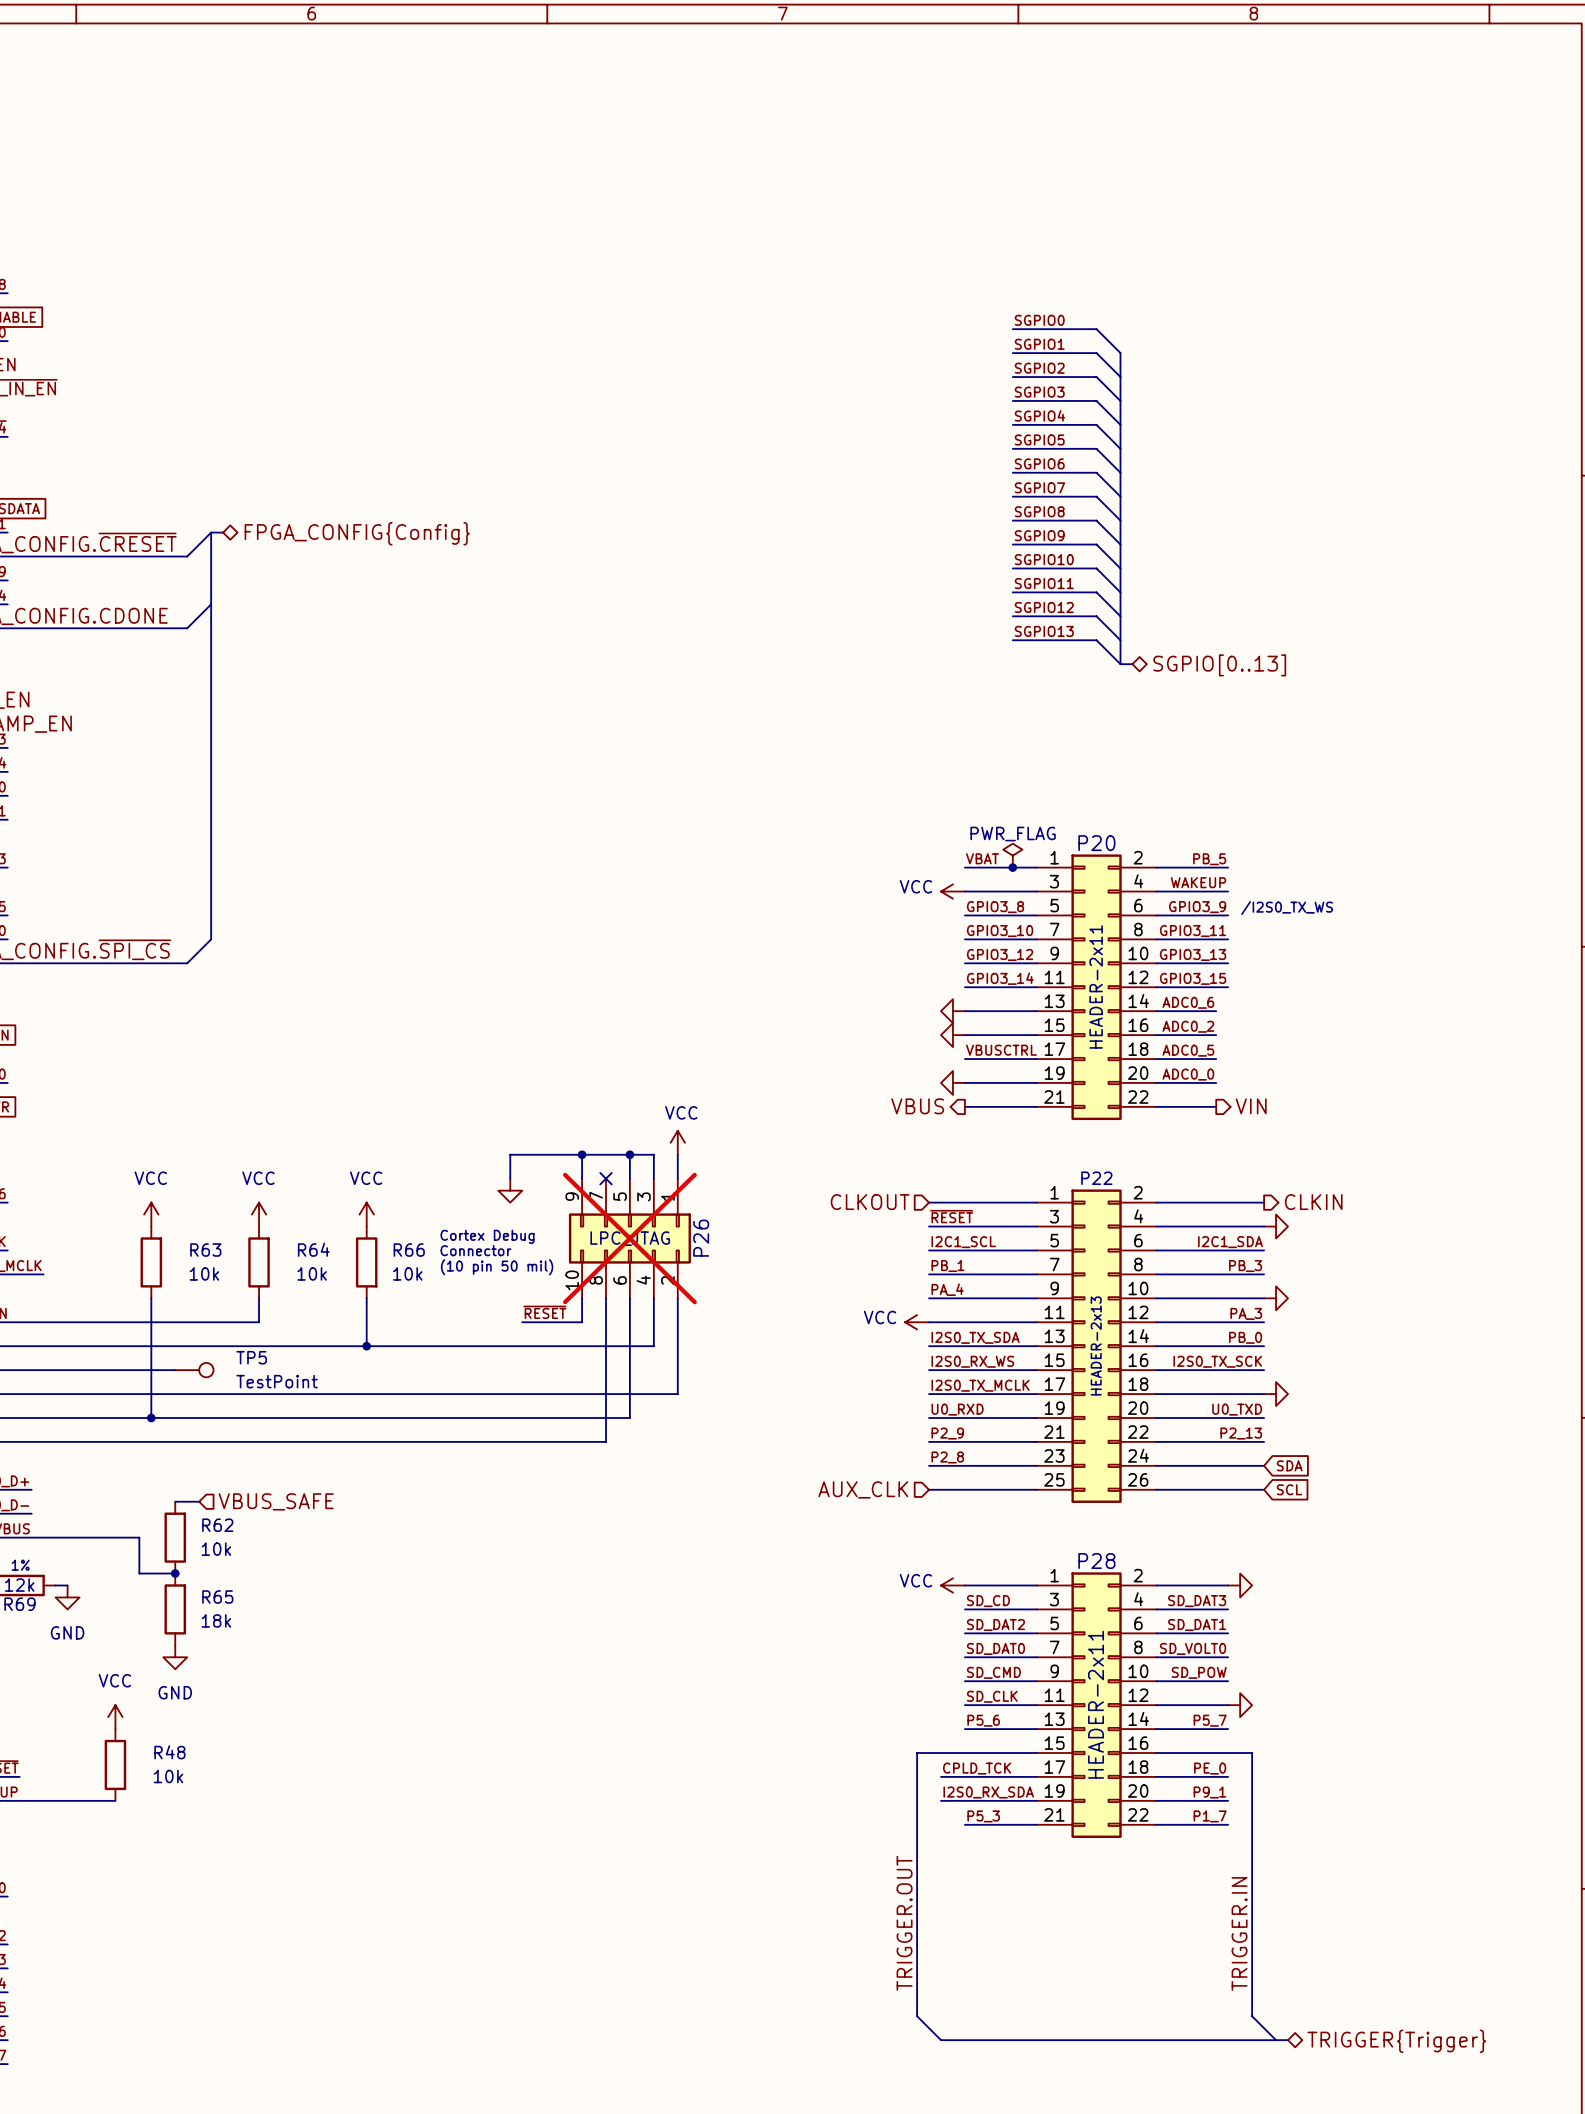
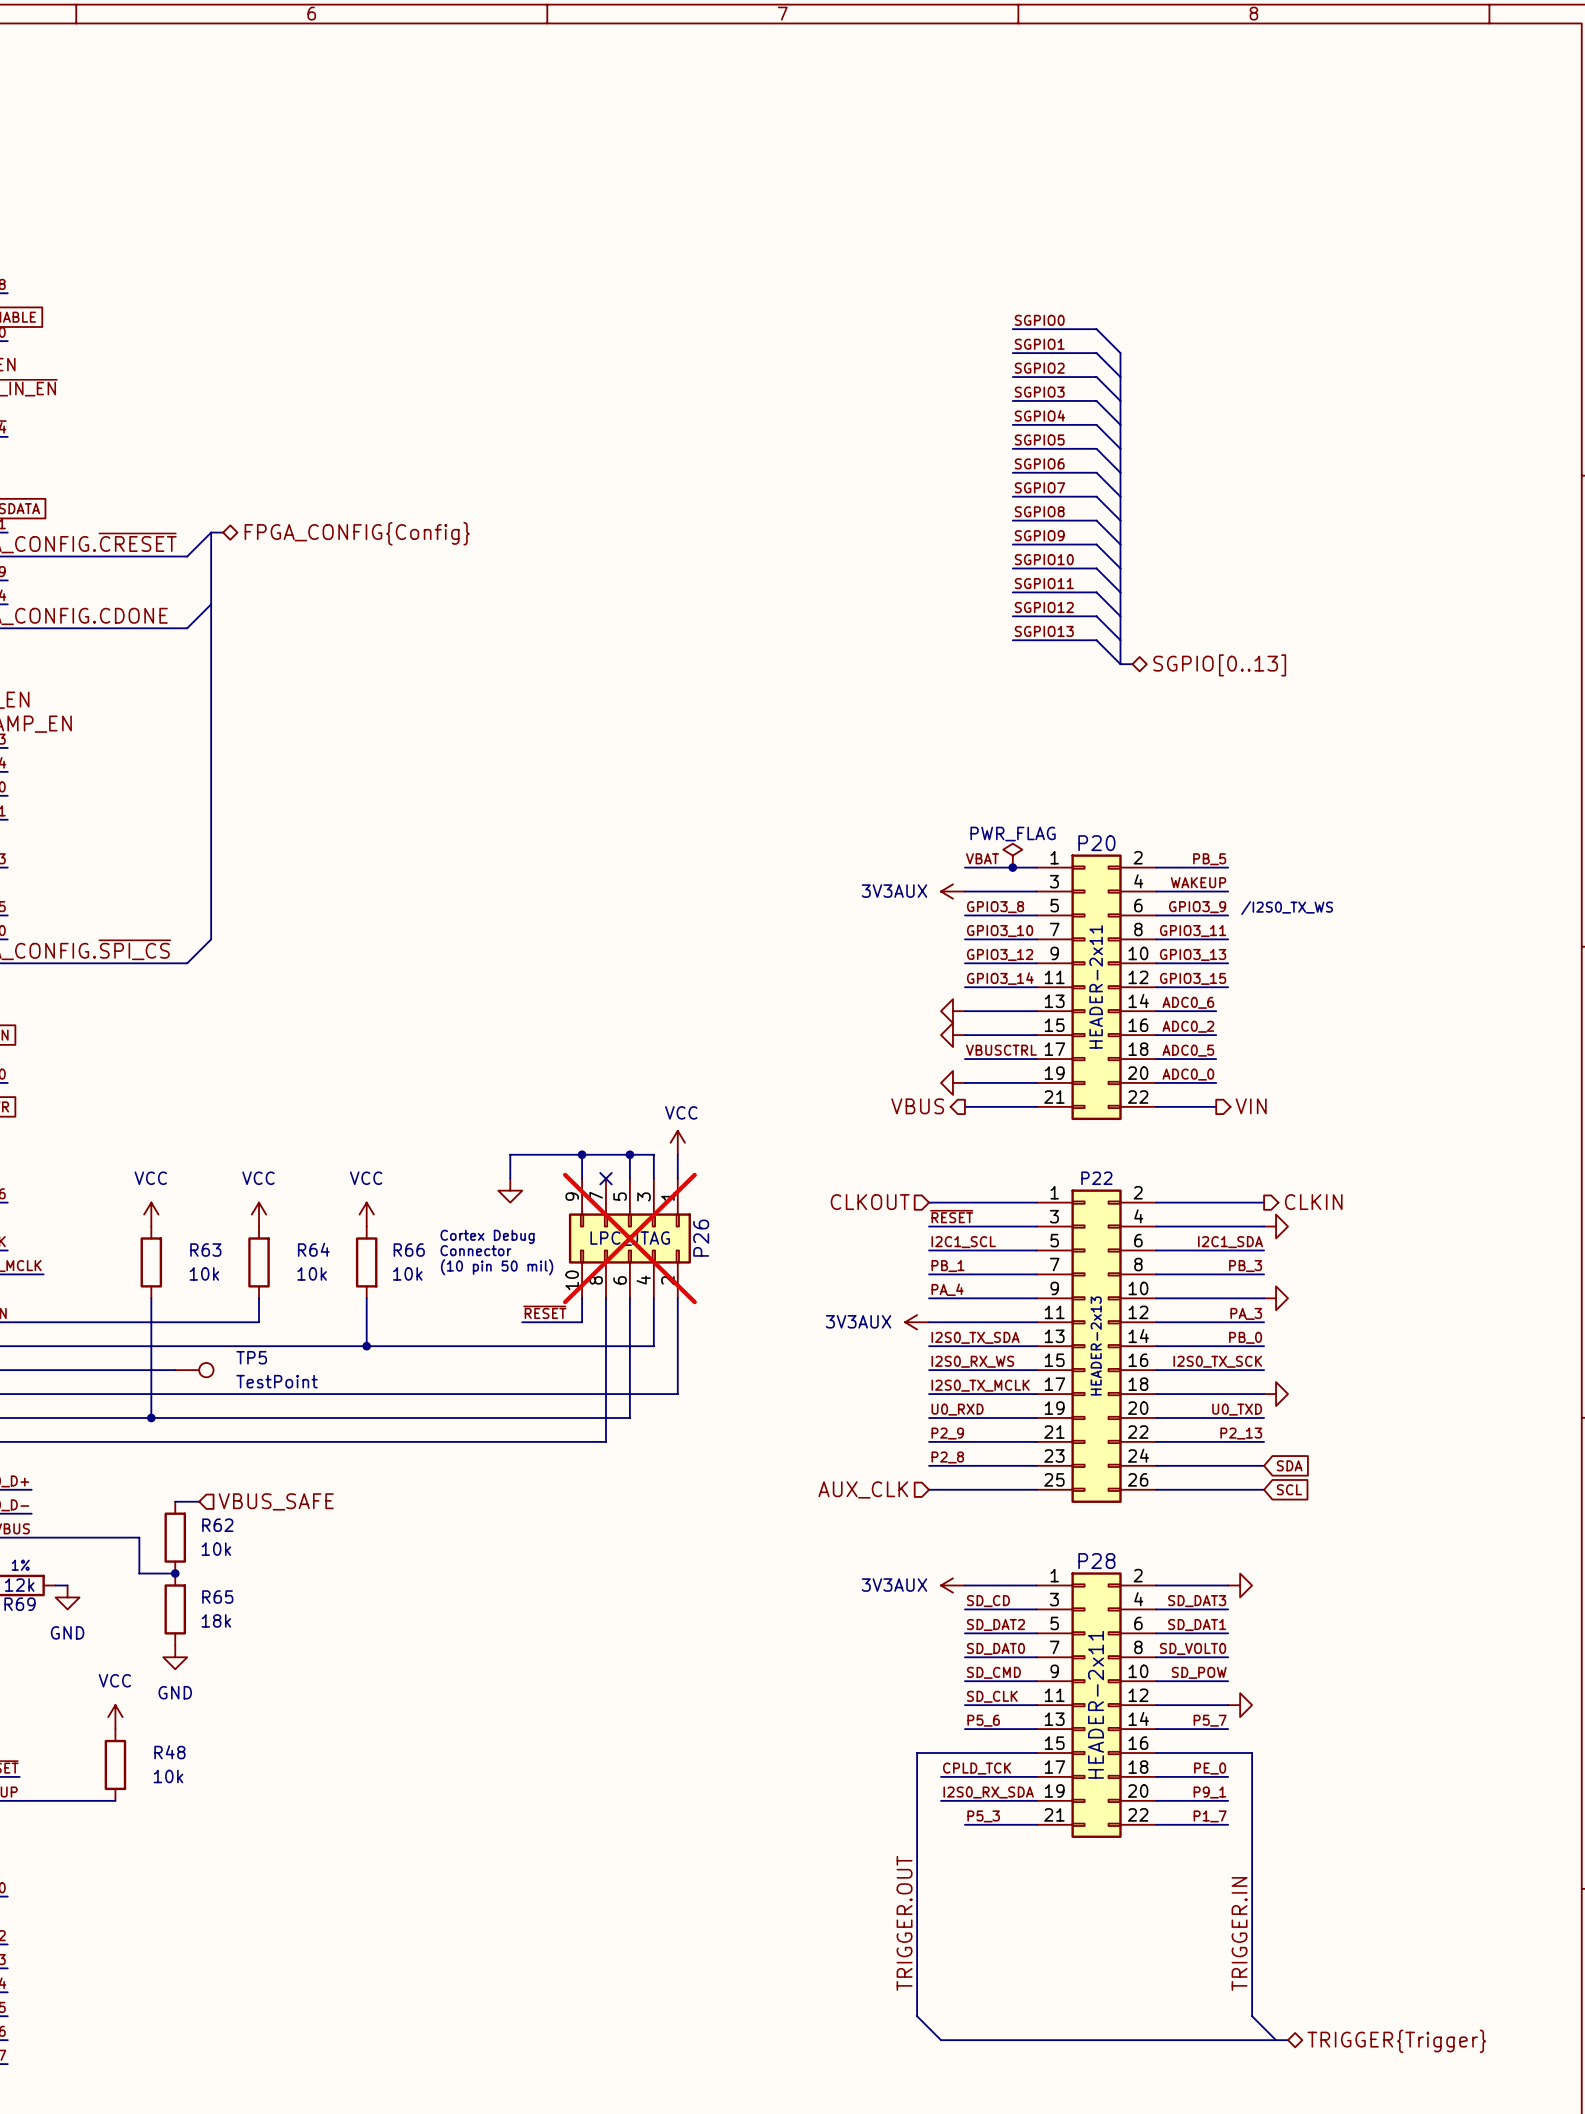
power symbol: VCC (952, 891) -> 3V3AUX (952, 891)
power symbol: VCC (917, 1322) -> 3V3AUX (917, 1322)
power symbol: VCC (952, 1585) -> 3V3AUX (952, 1585)

